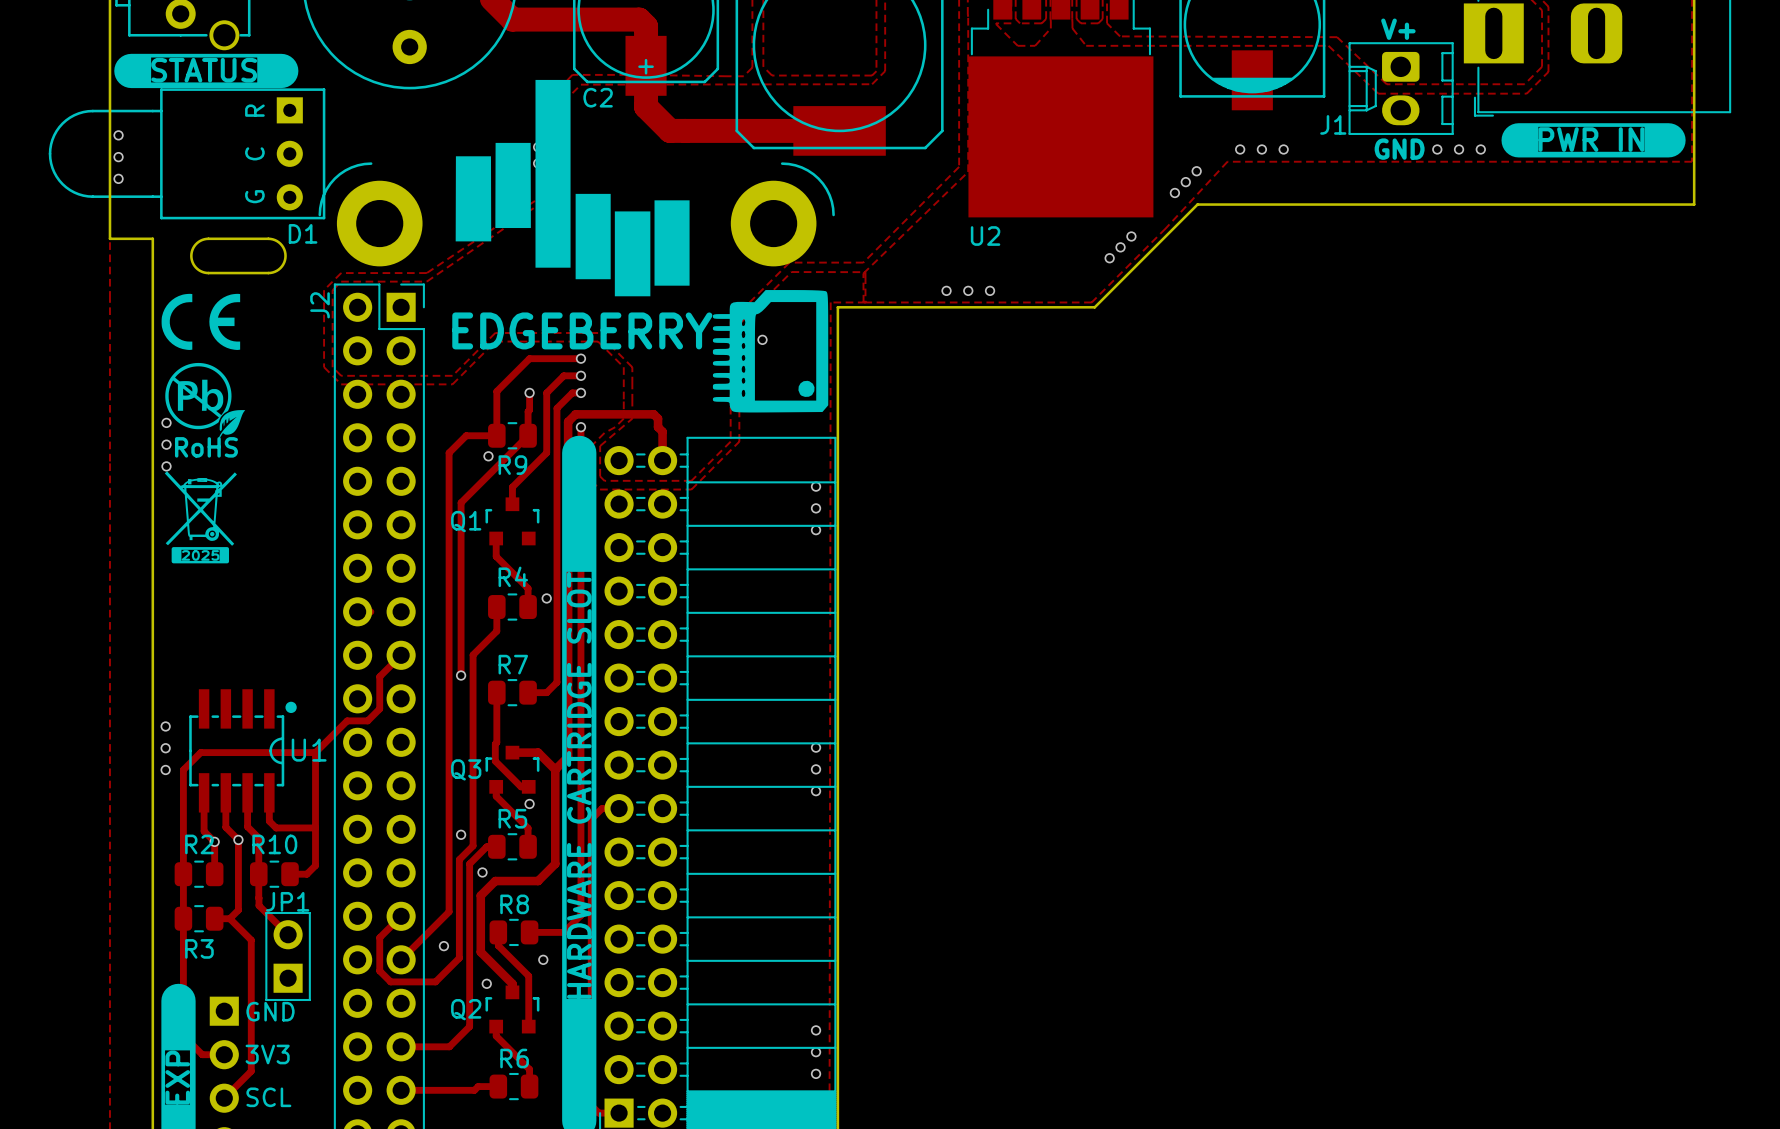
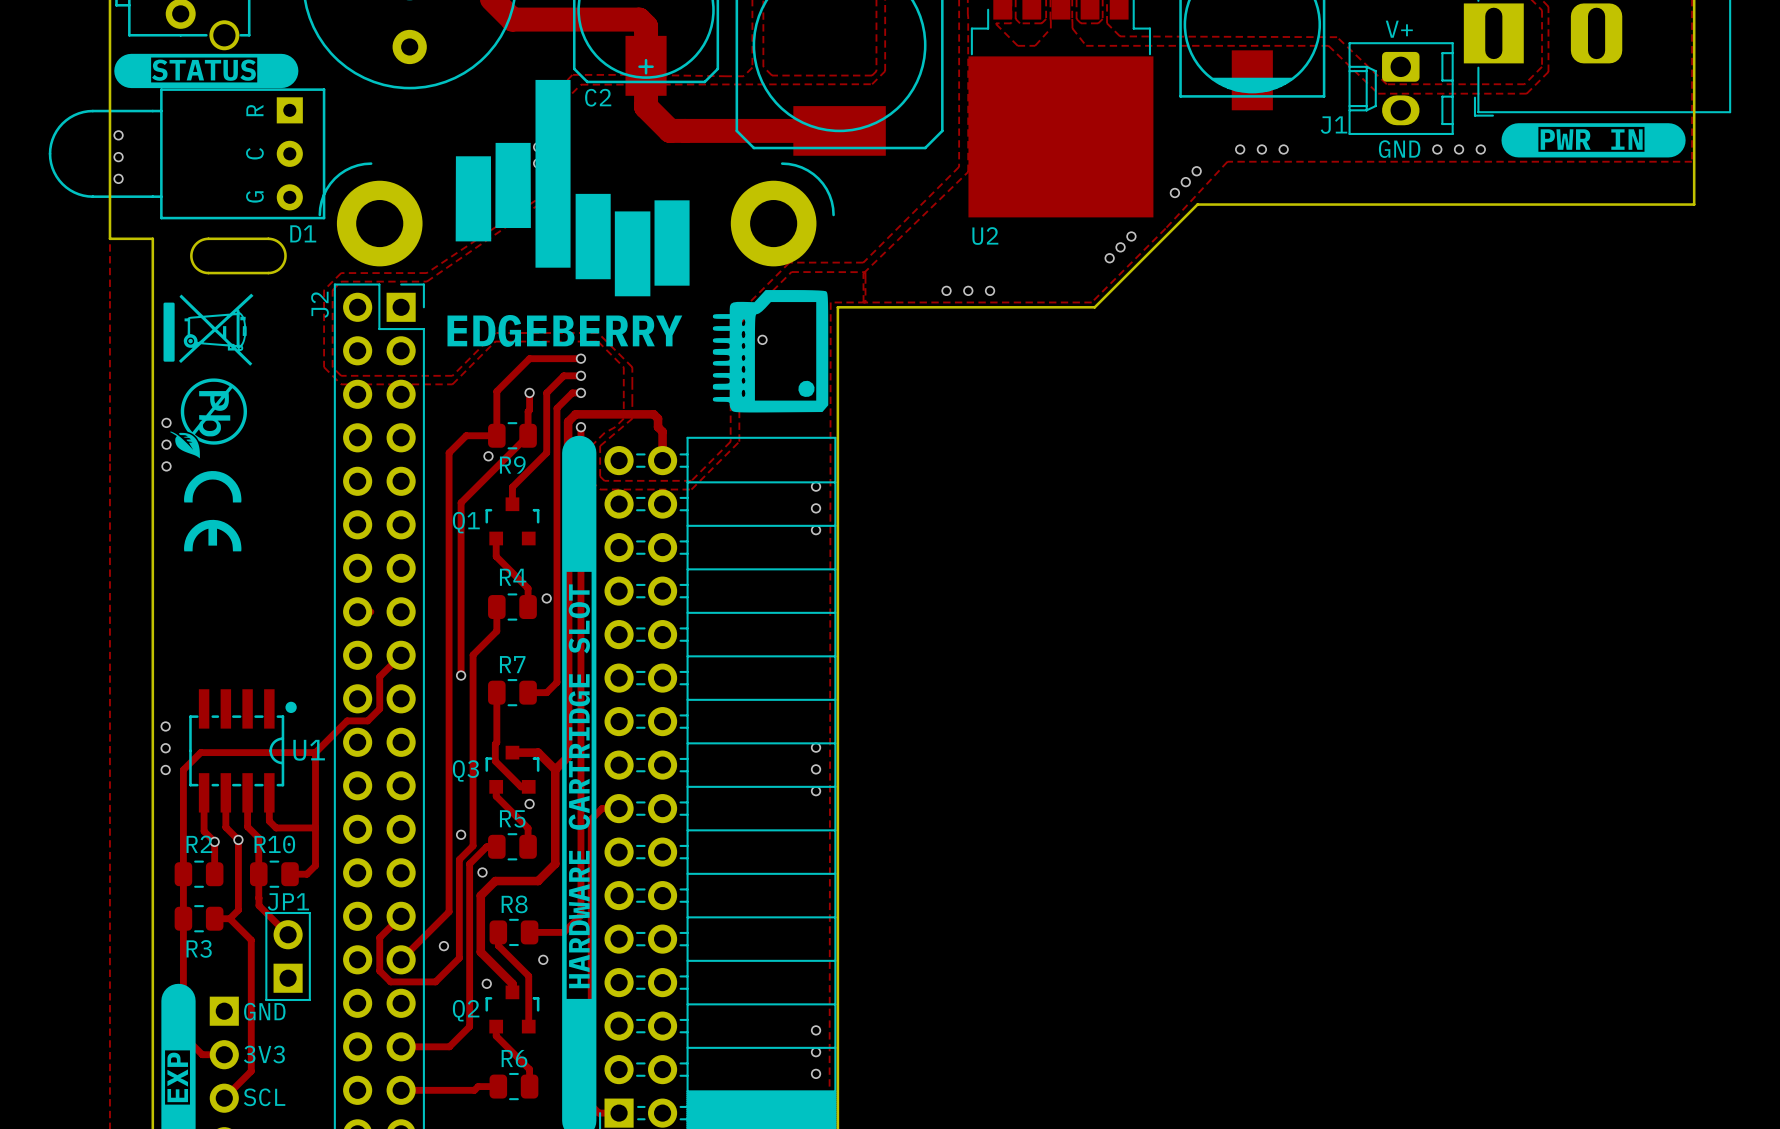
drawing: [161, 293, 246, 440] -> none
drawing: none -> [163, 293, 254, 459]
text: RoHS (206, 447) -> none
drawing shape: [164, 471, 237, 546] -> [184, 471, 242, 552]
drawing: [171, 547, 230, 564] -> none
text: 2025 (200, 555) -> none

